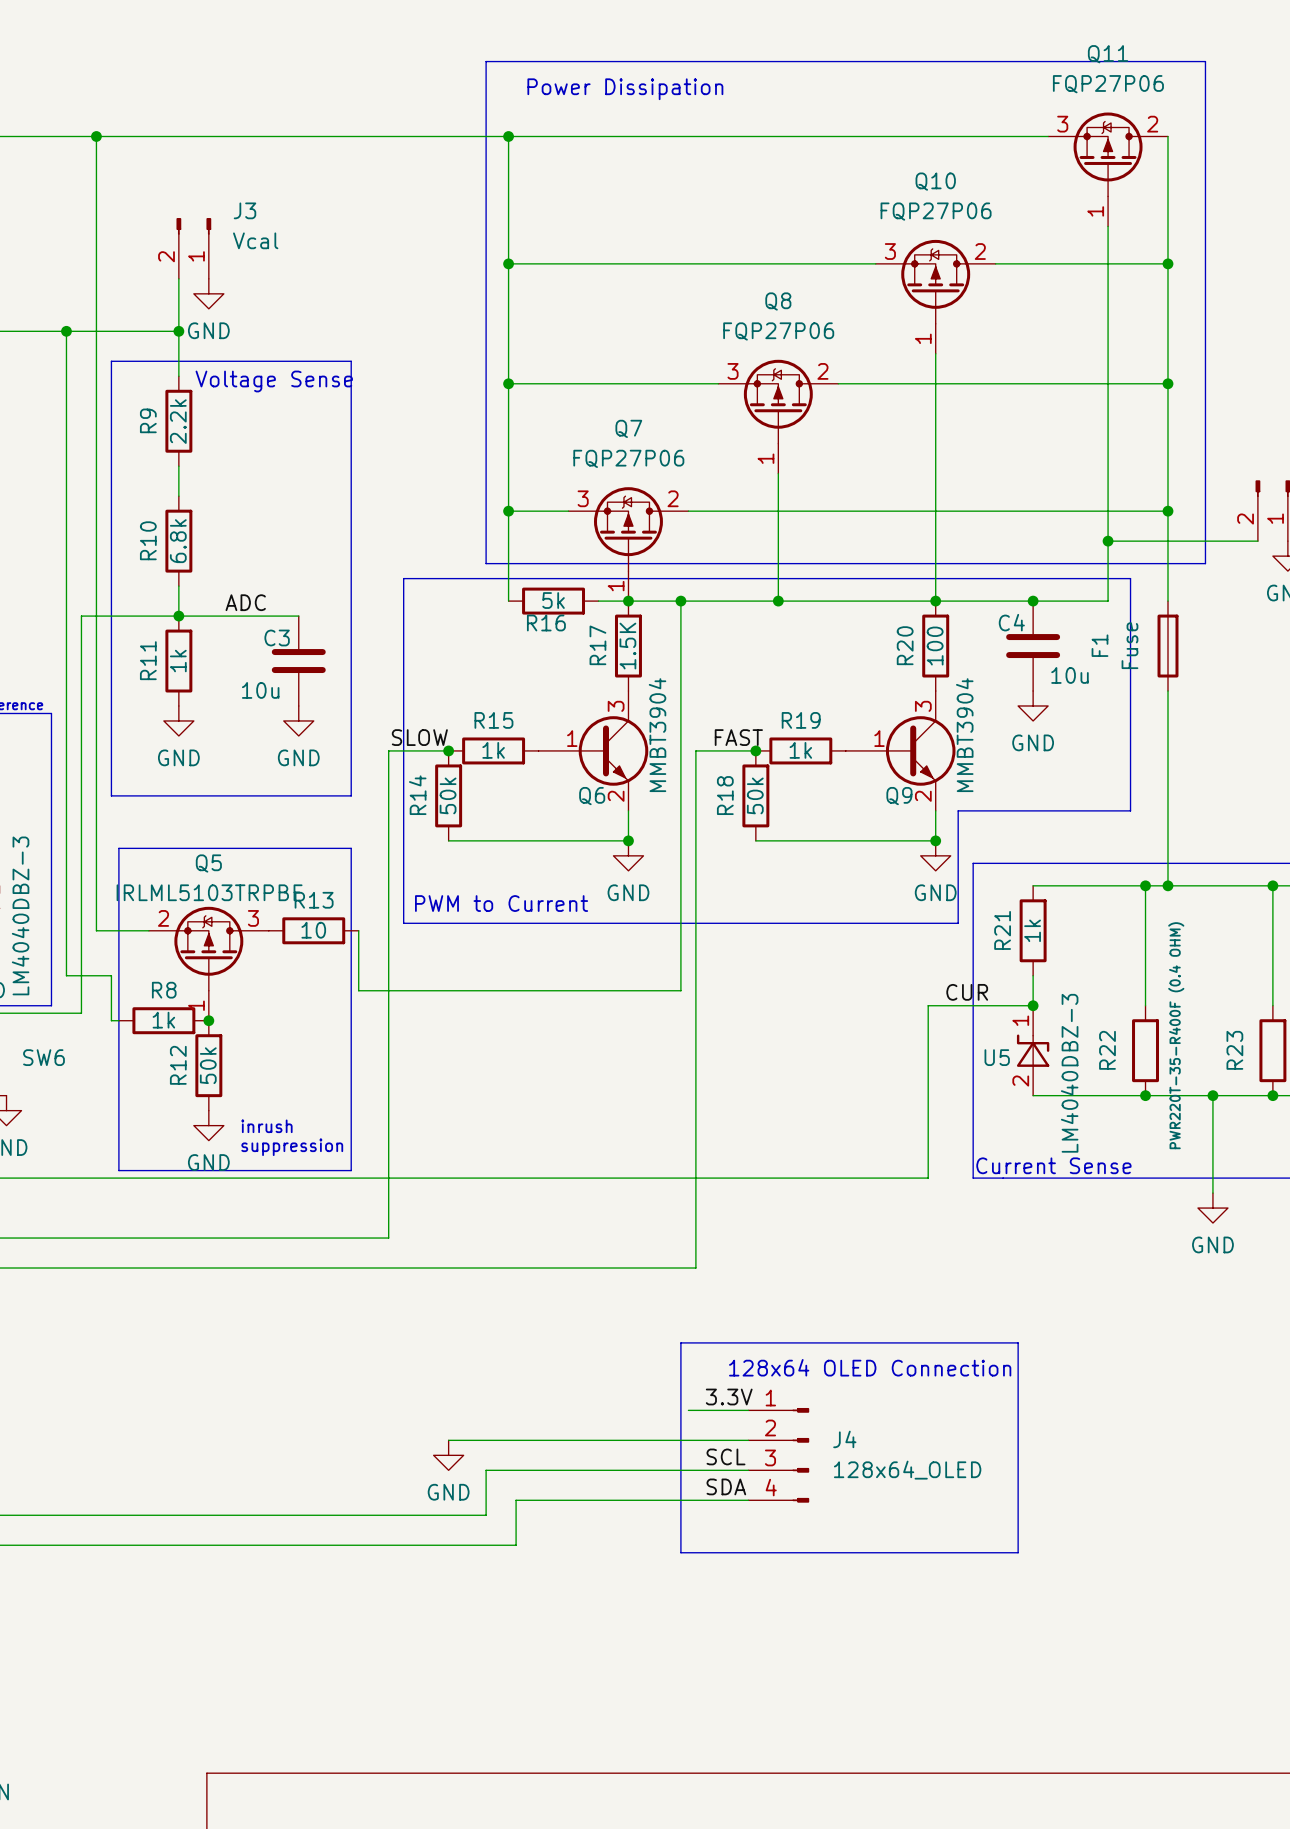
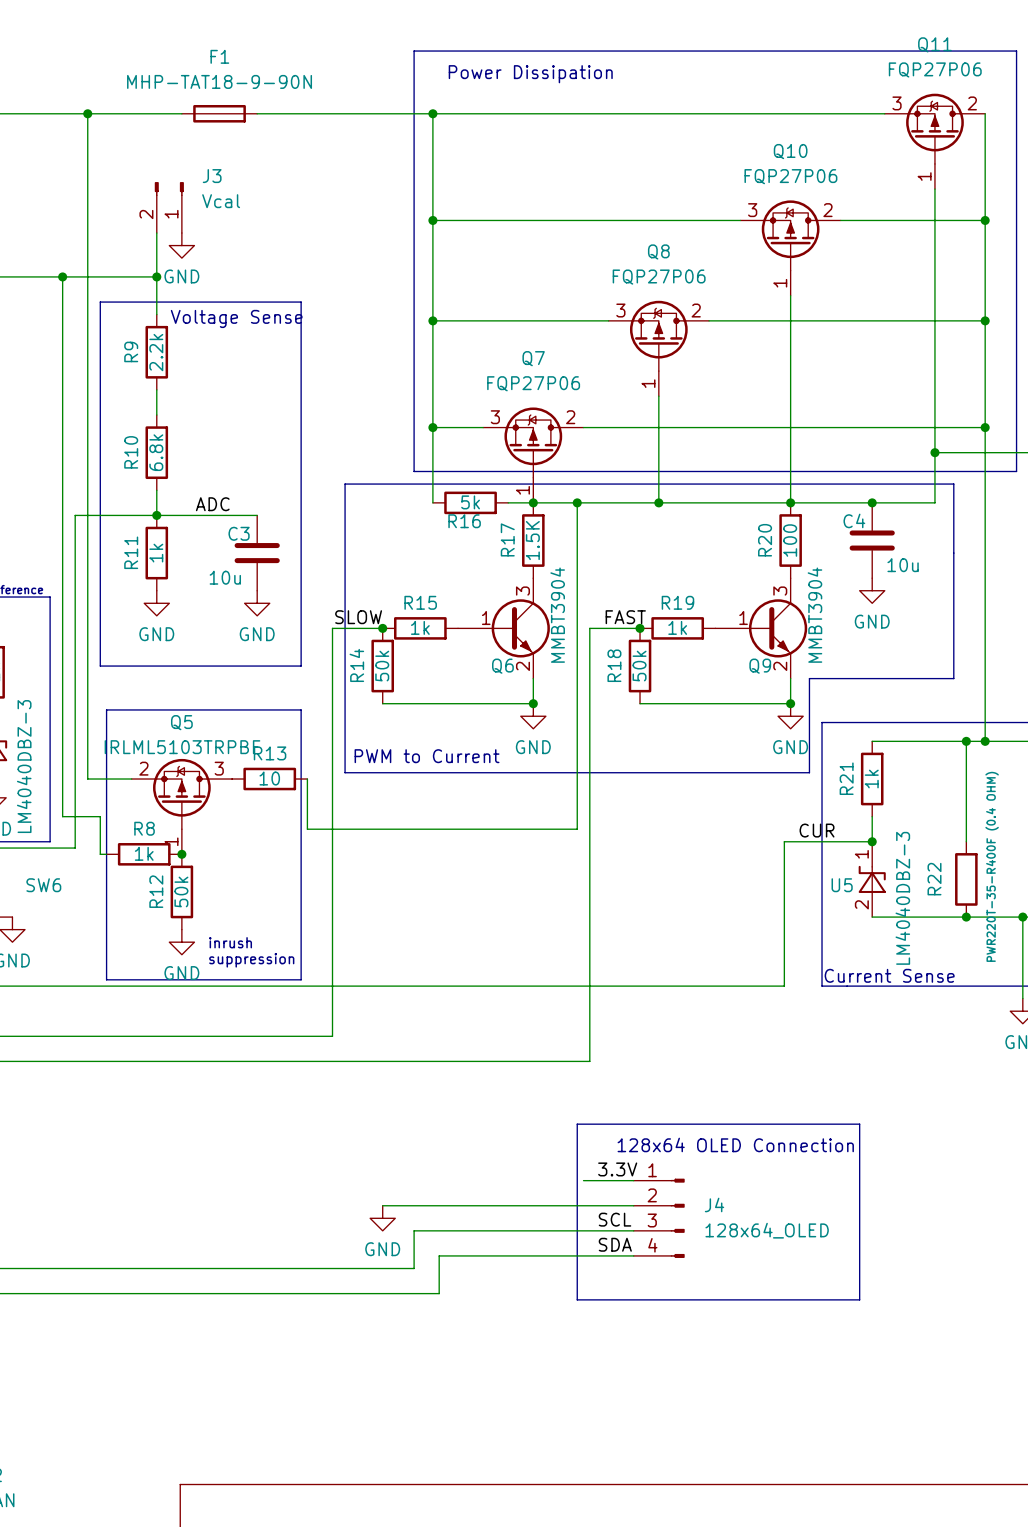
F1 value: Fuse (1129, 645) -> MHP-TAT18-9-90N (219, 81)
F1 rotation: 0° (1168, 646) -> 90° clockwise (219, 113)
F1 position: (1168, 646) -> (219, 113)

